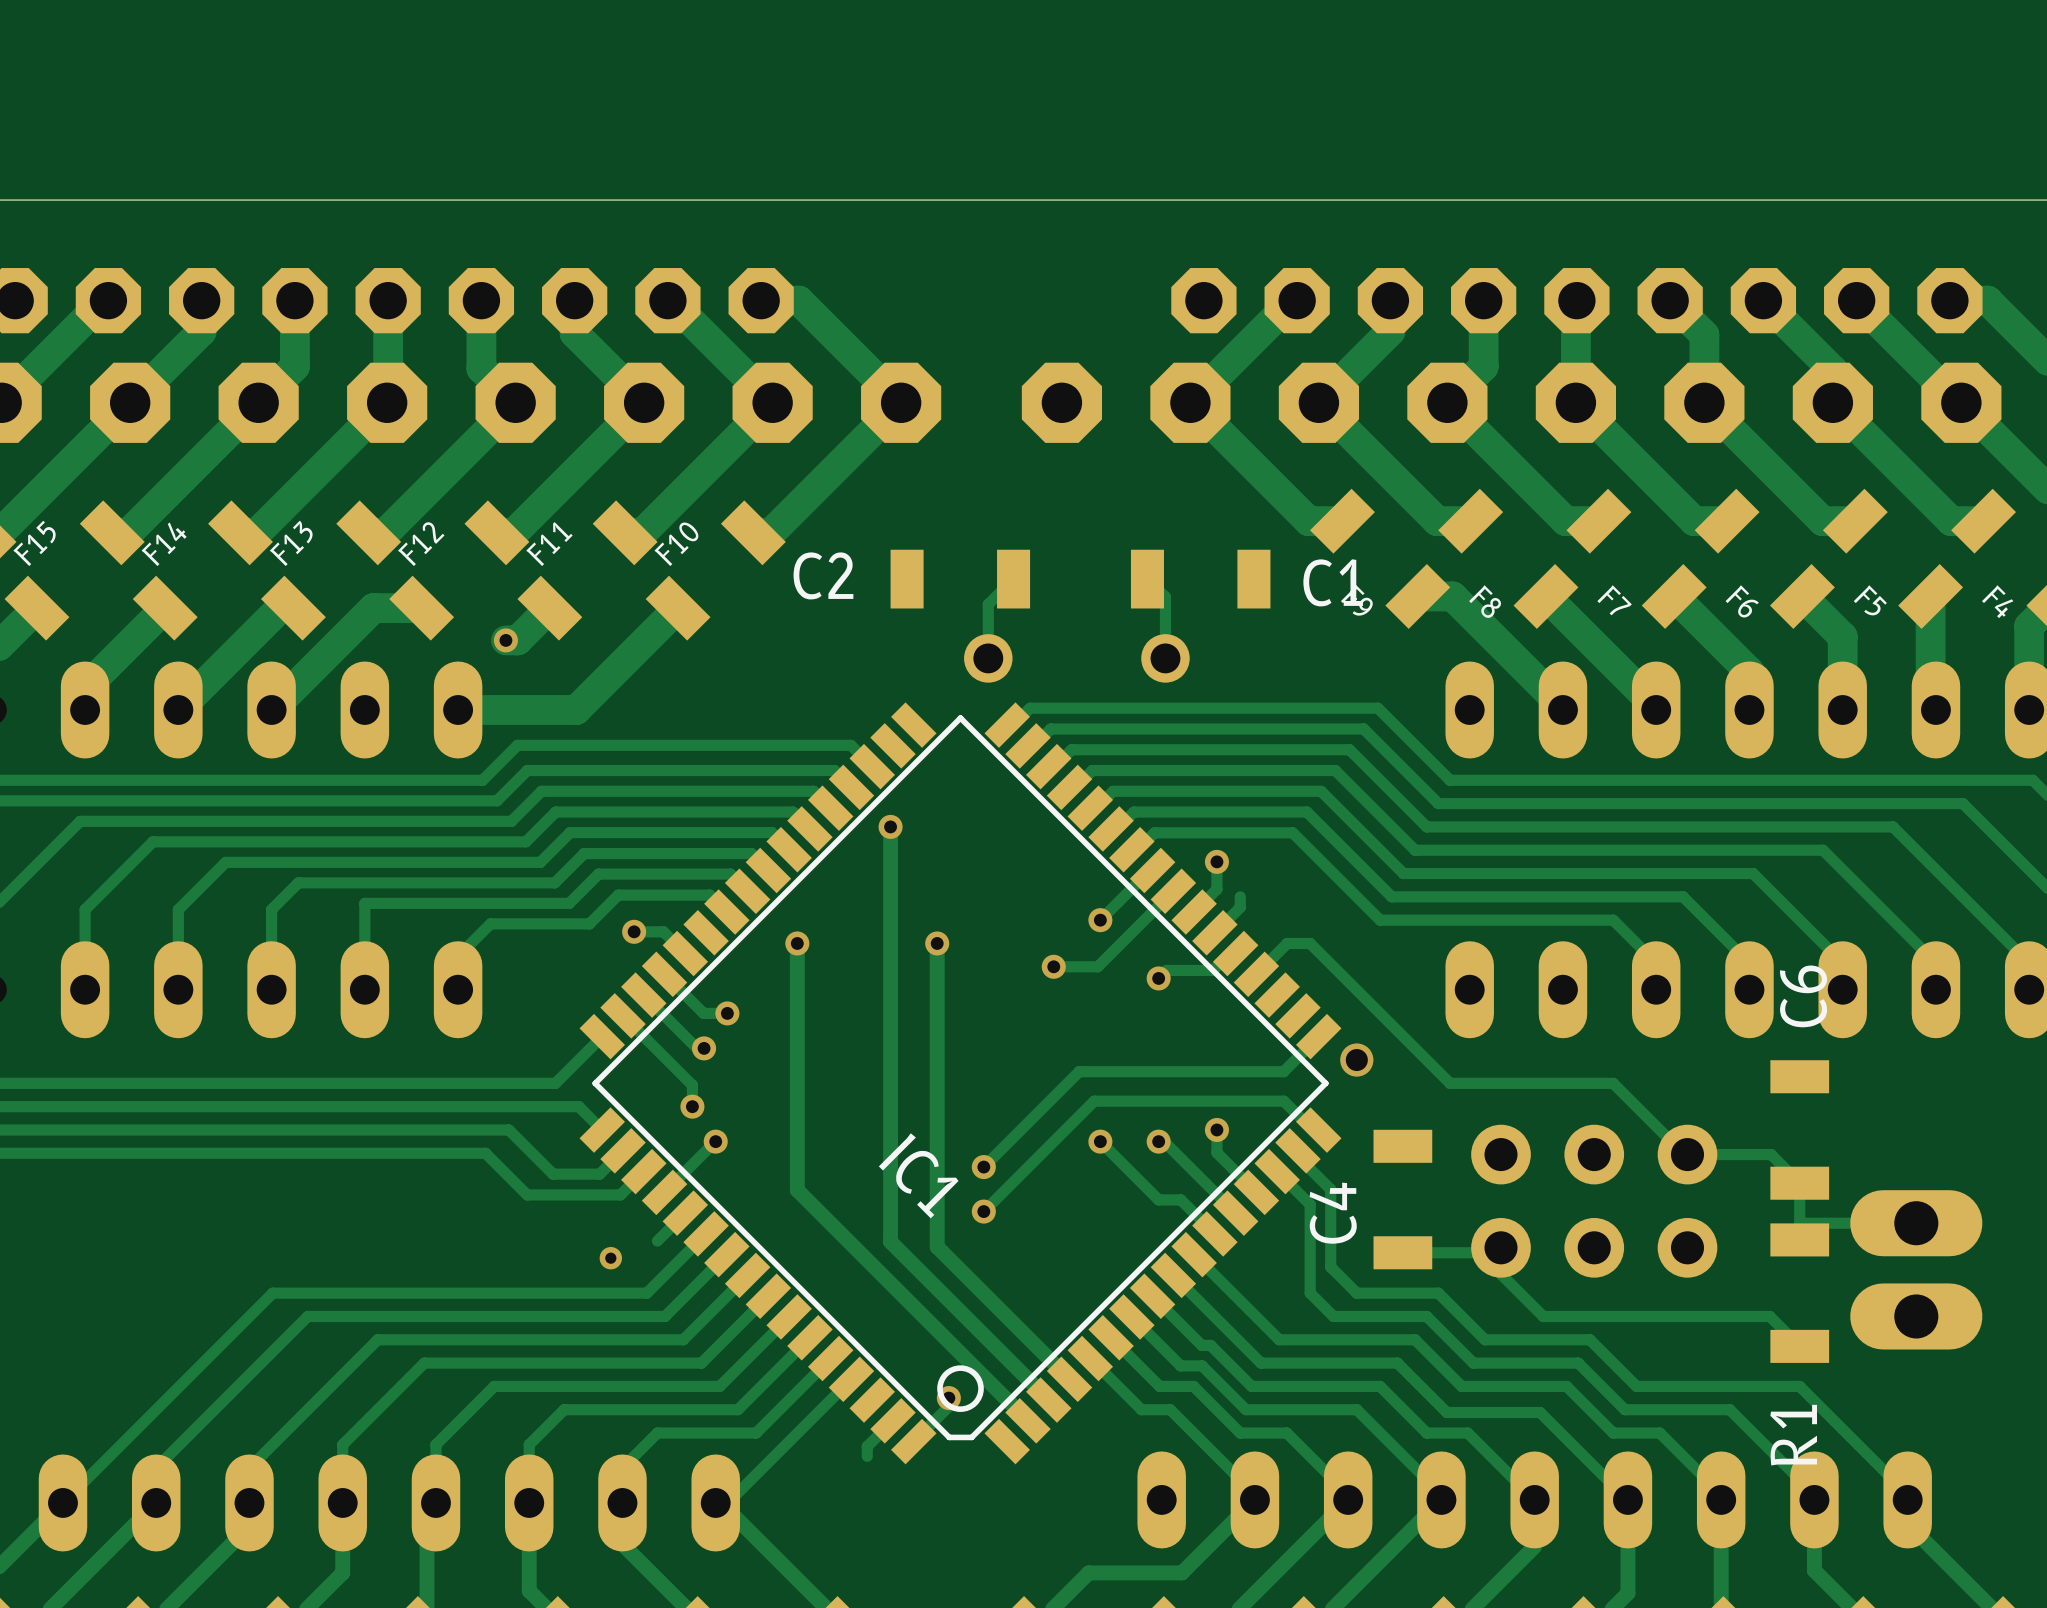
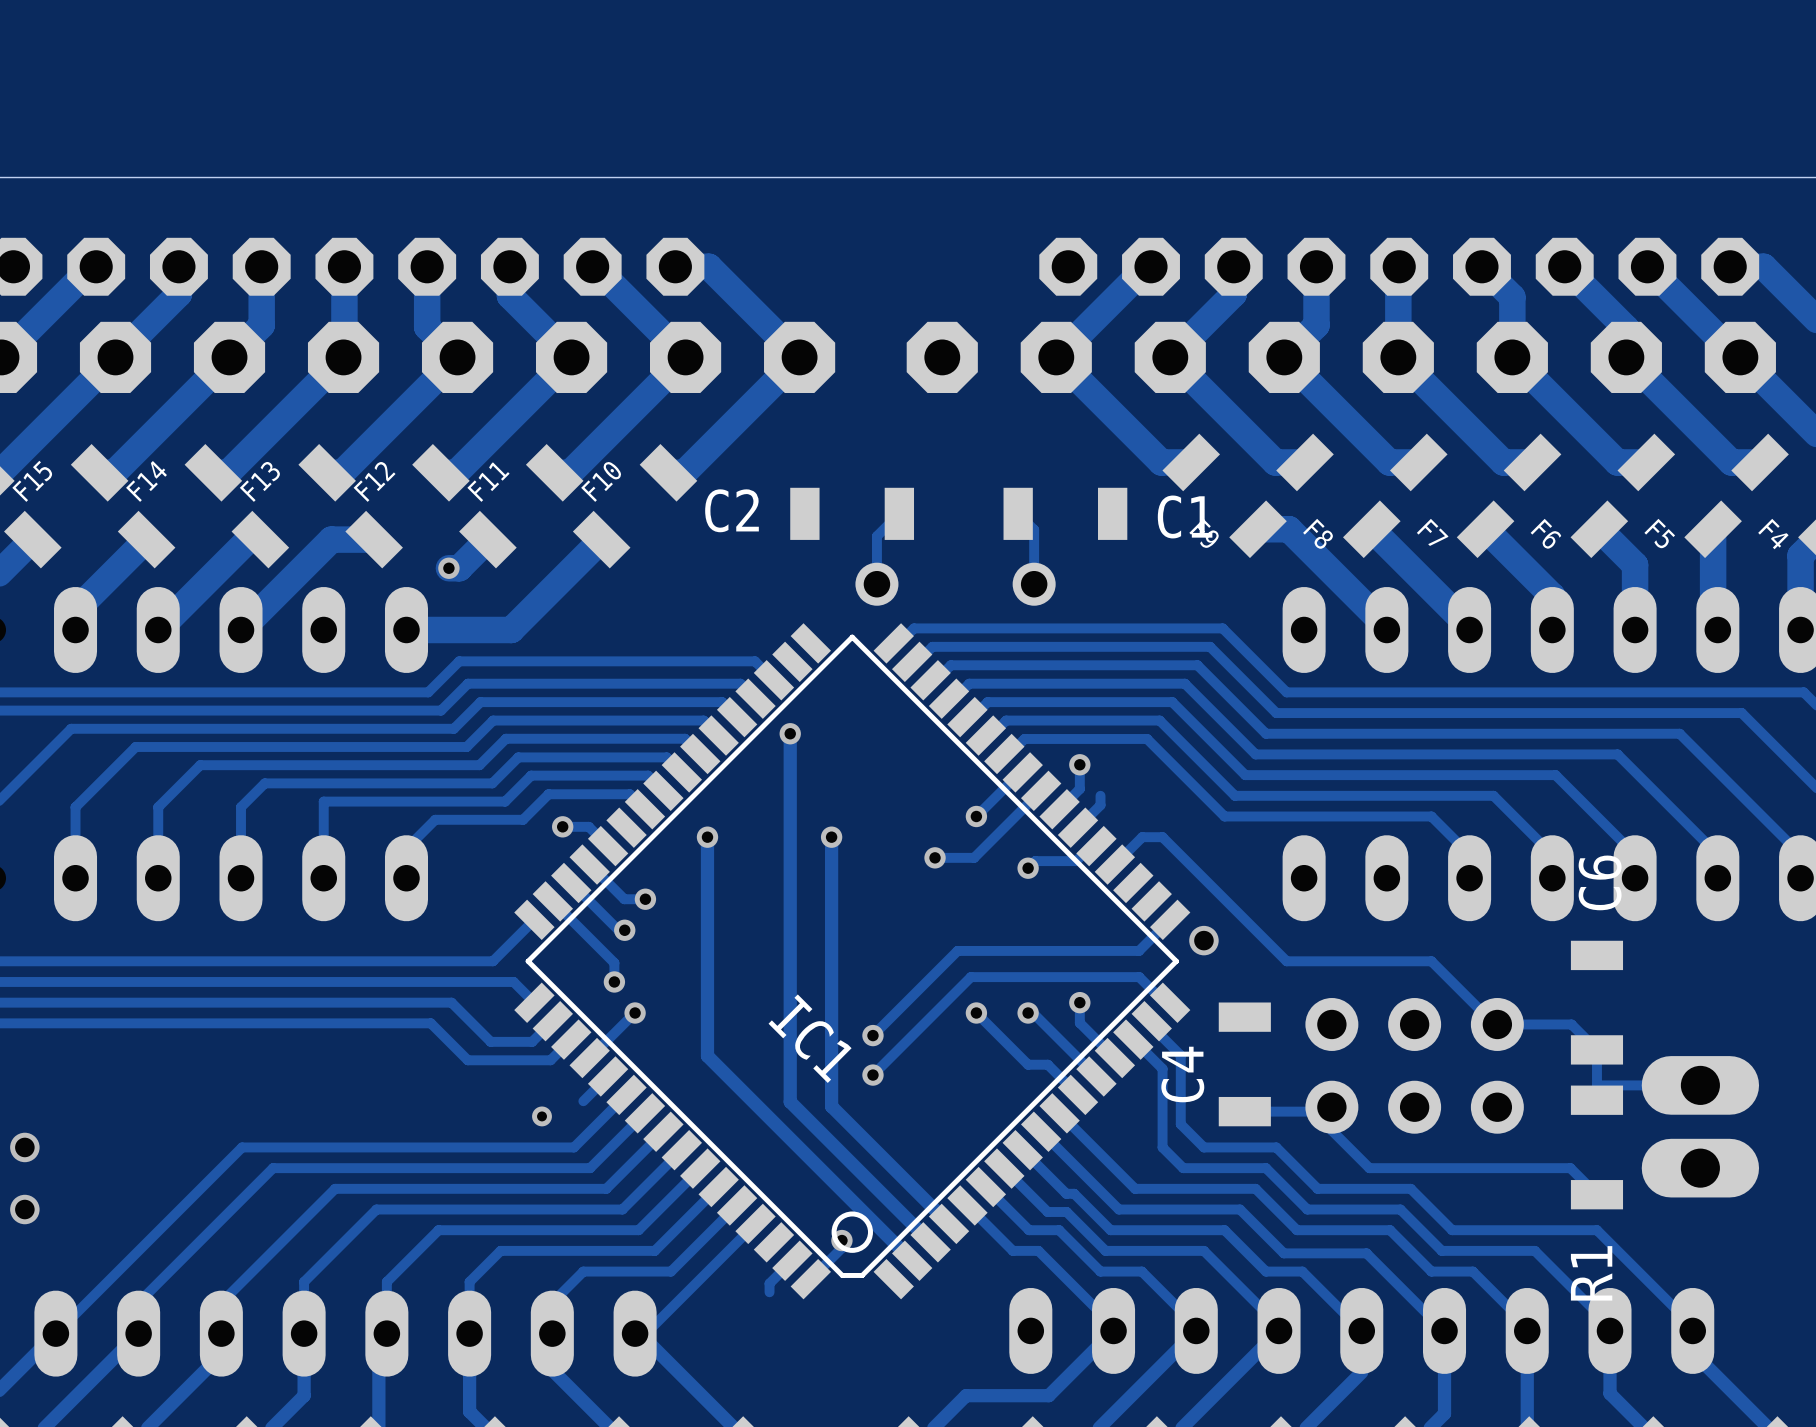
via: none -> (24, 1147)
via: none -> (24, 1209)

